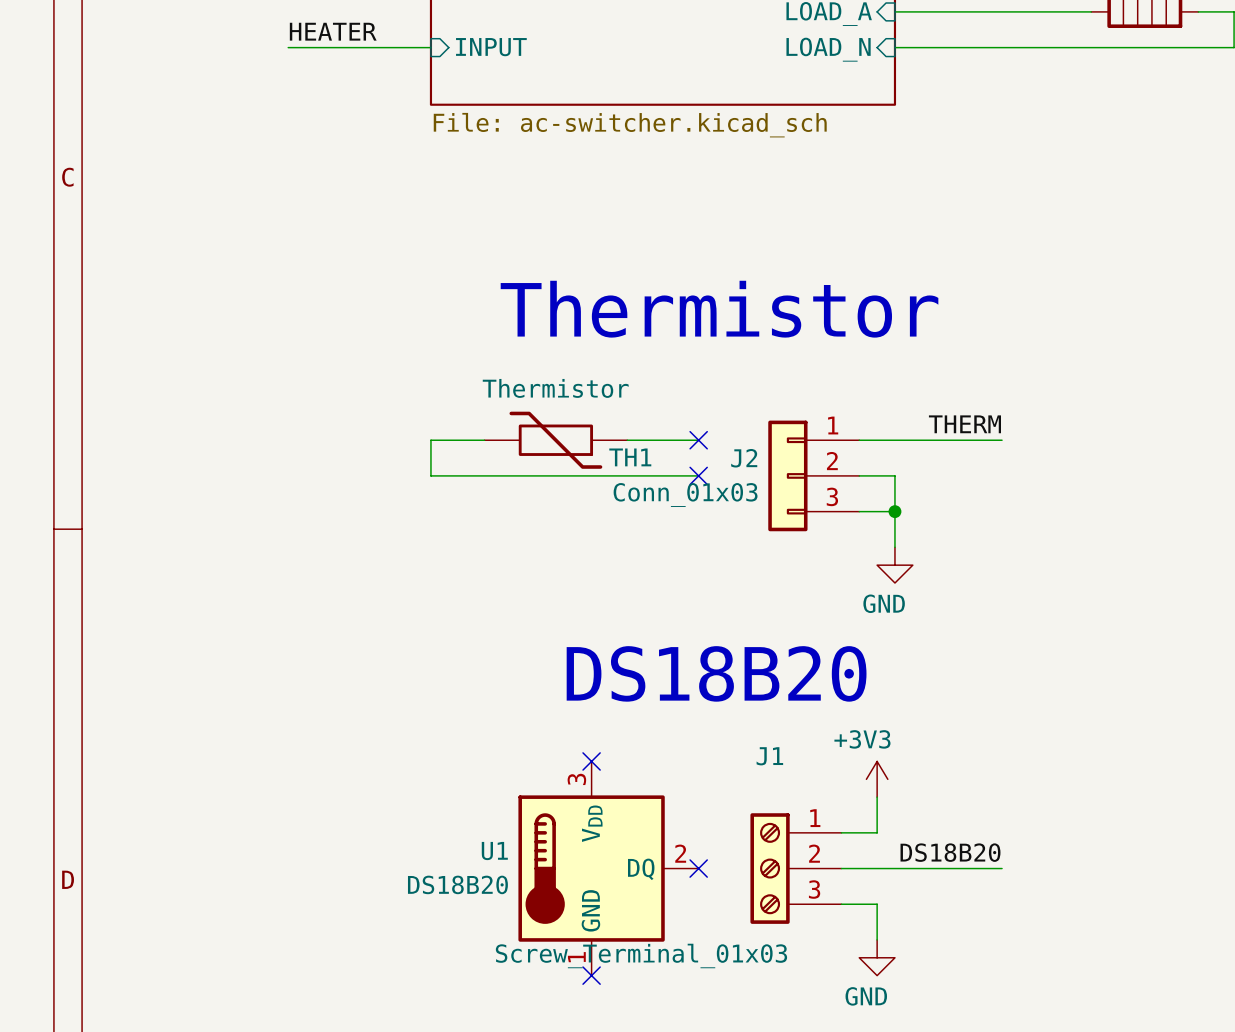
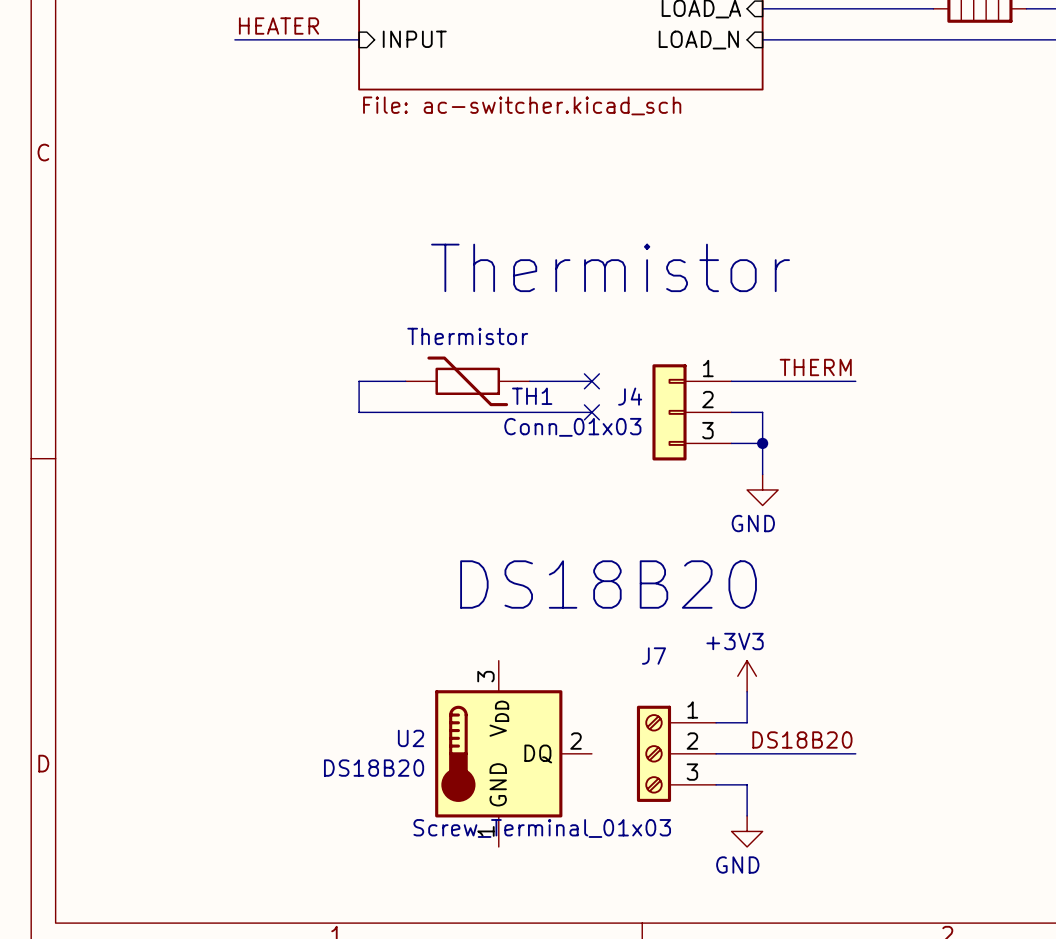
J2 name: J2 (744, 458) -> J4 (630, 396)
J1 name: J1 (769, 756) -> J7 (653, 656)
no-connect mark: (591, 761) -> none
U1 name: U1 (494, 851) -> U2 (411, 738)
no-connect mark: (698, 868) -> none
no-connect mark: (591, 975) -> none

